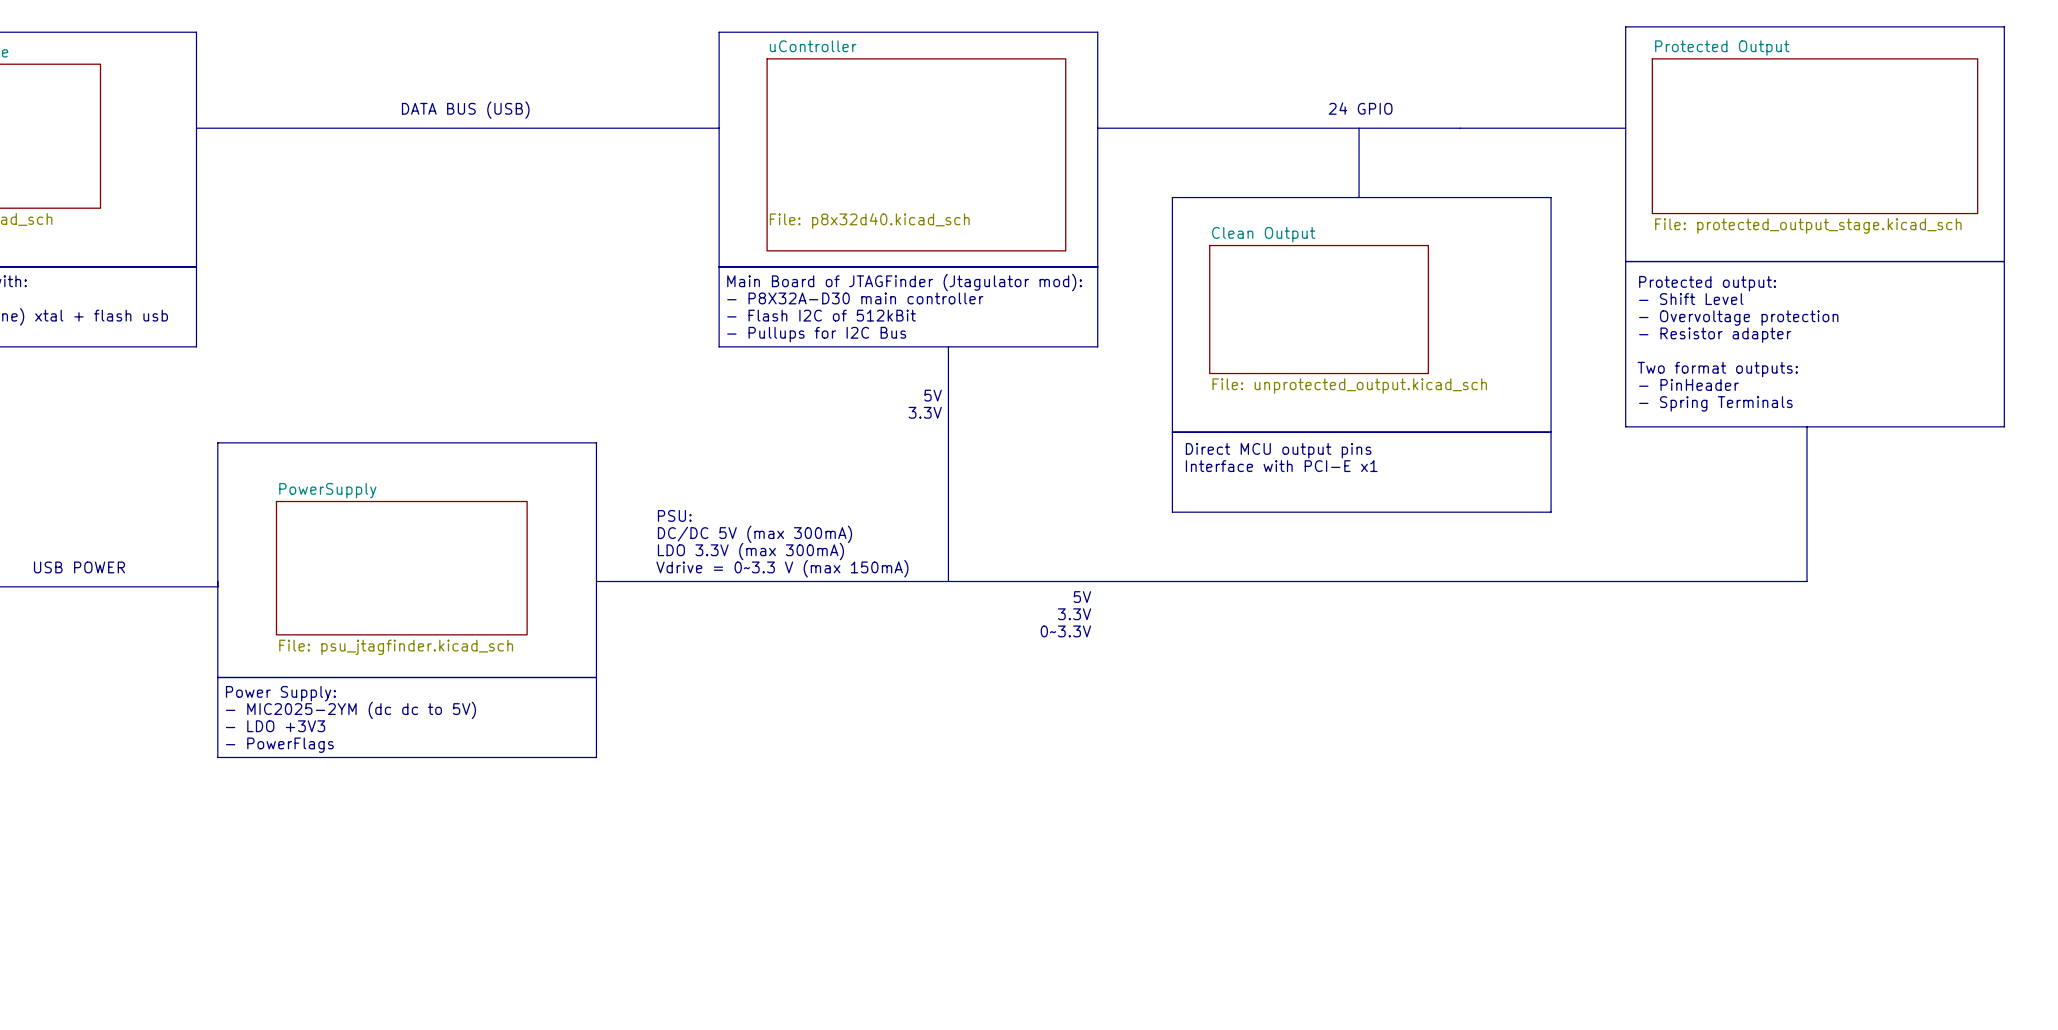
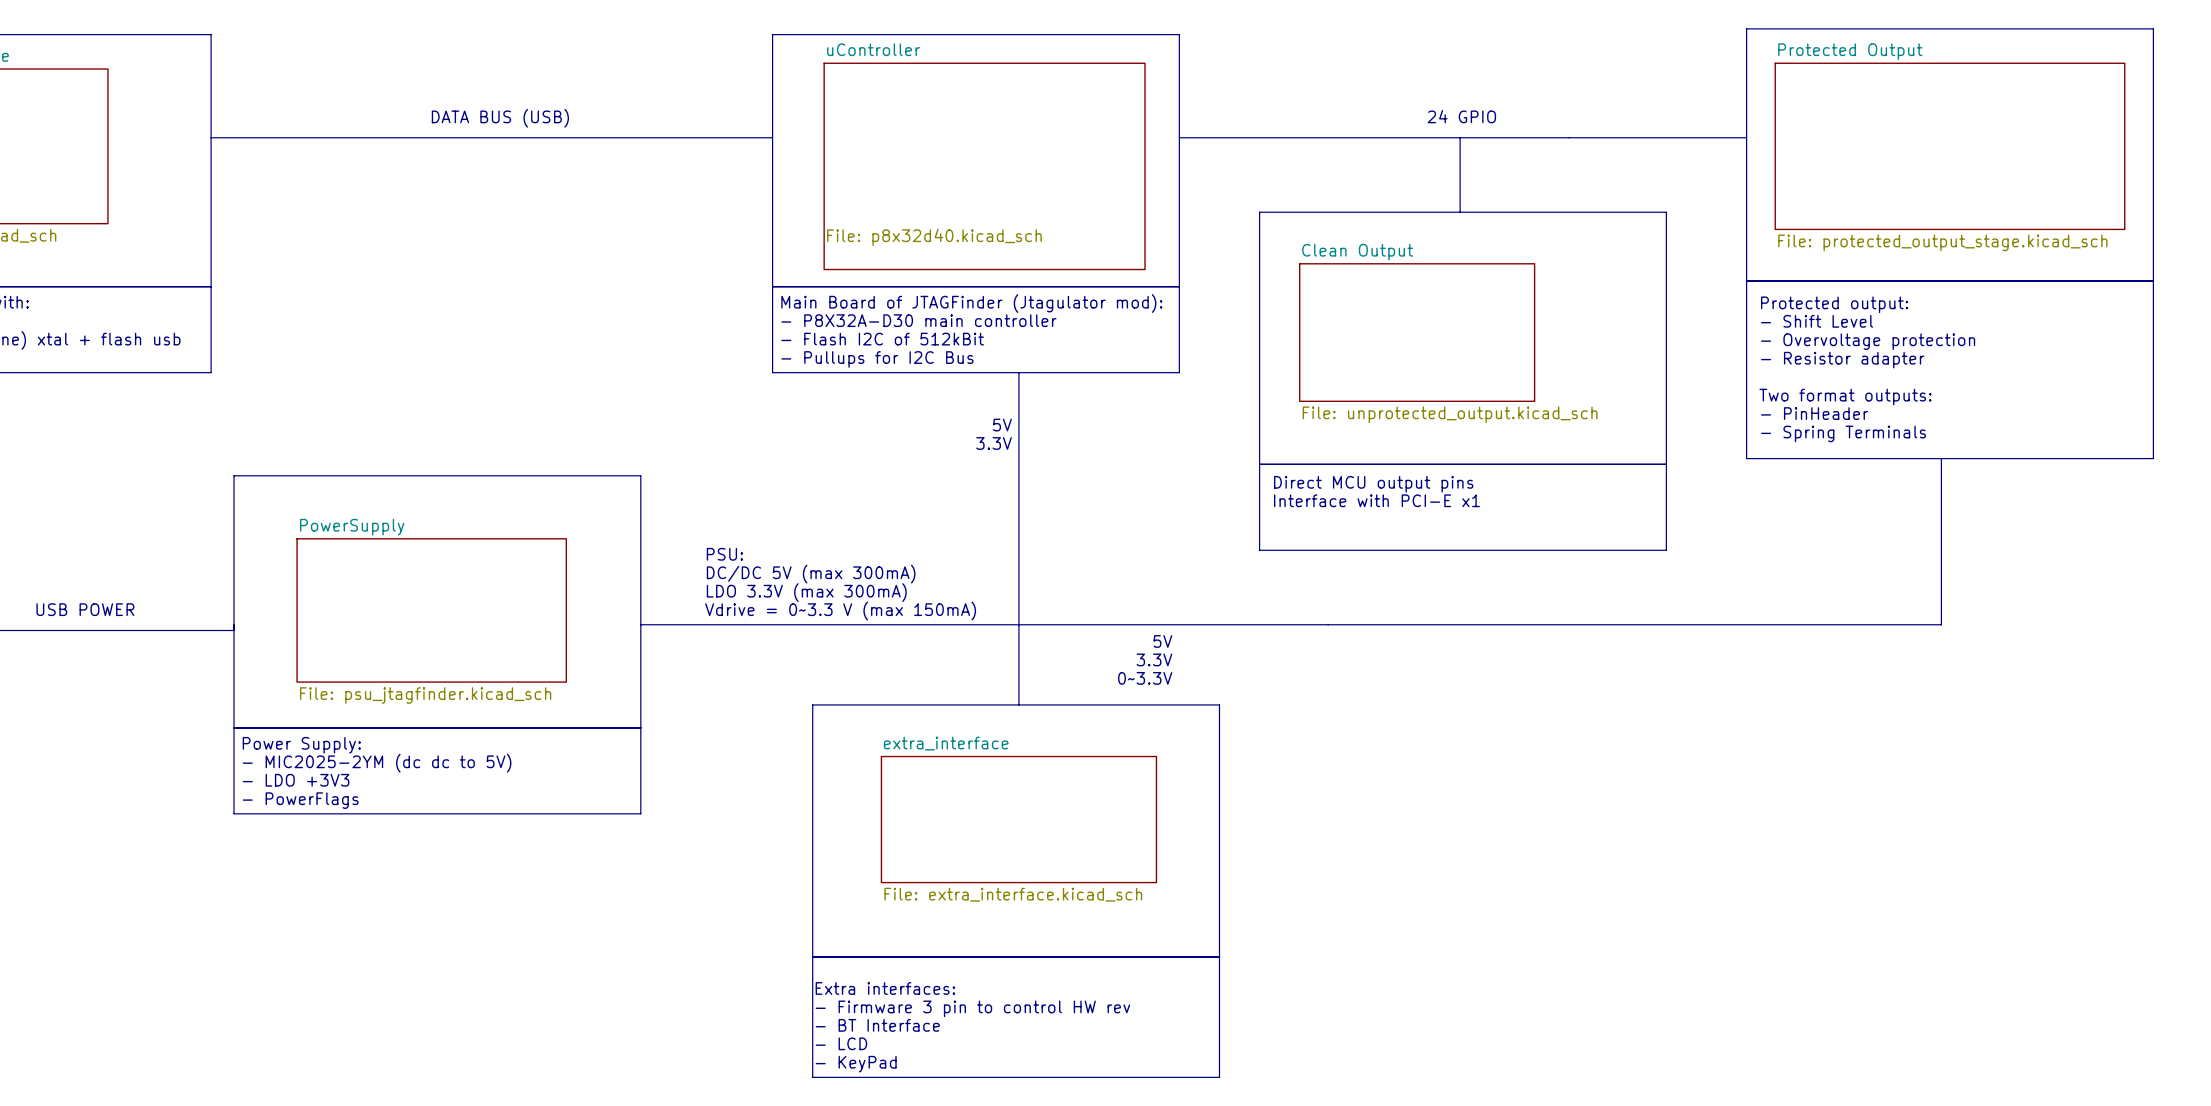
line: none -> (1018, 624) (1018, 704)
line: none -> (812, 704) (812, 1077) (1219, 1077) (1219, 704) (812, 704)
sheet extra_interface: none -> File: extra_interface.kicad_sch (1018, 819)
line: none -> (812, 957) (1219, 957)
text: none -> Extra interfaces: (885, 988)
text: none -> - Firmware 3 pin to control HW rev (972, 1008)
text: none -> - BT Interface (877, 1025)
text: none -> - LCD (841, 1043)
text: none -> - KeyPad (856, 1064)

